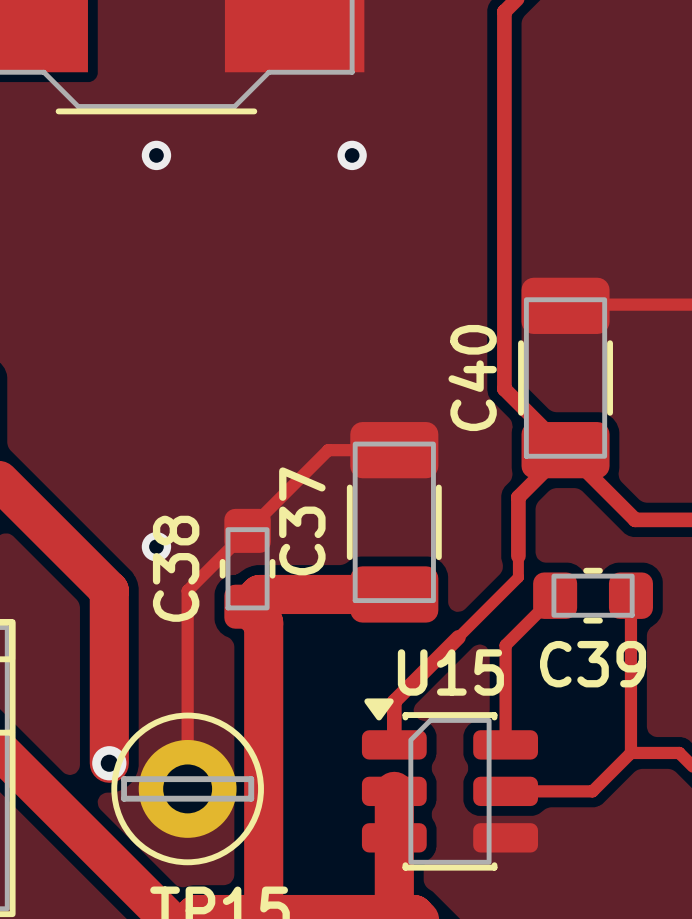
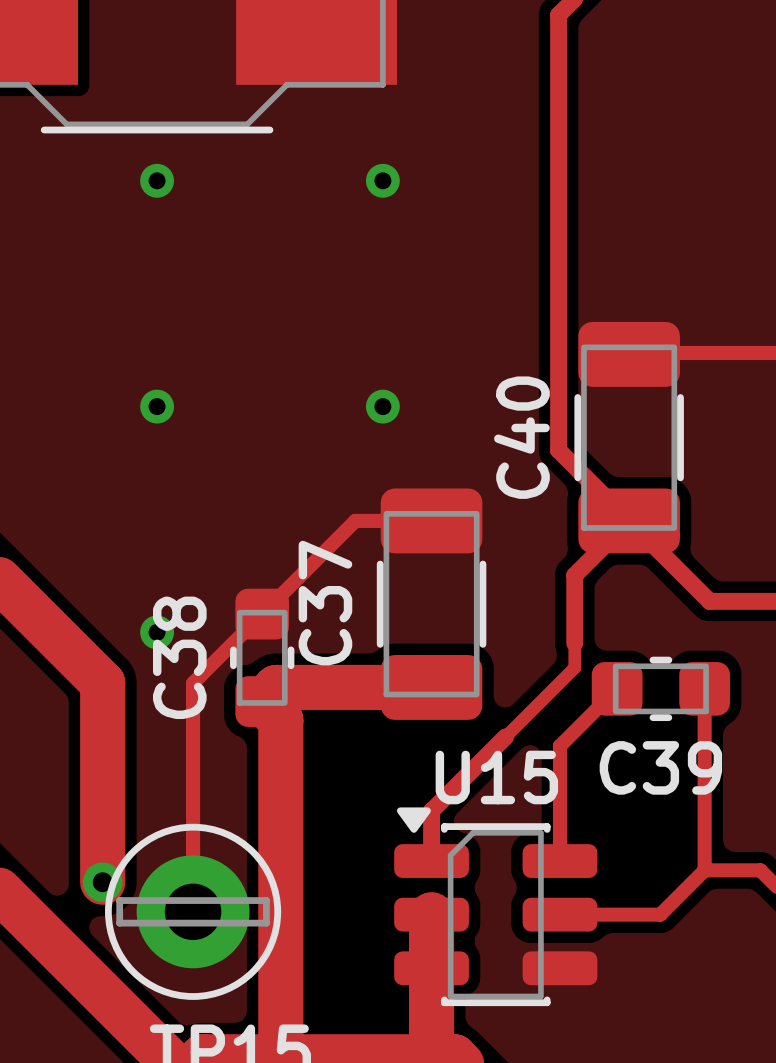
via: none -> (157, 406)
via: none -> (382, 406)

